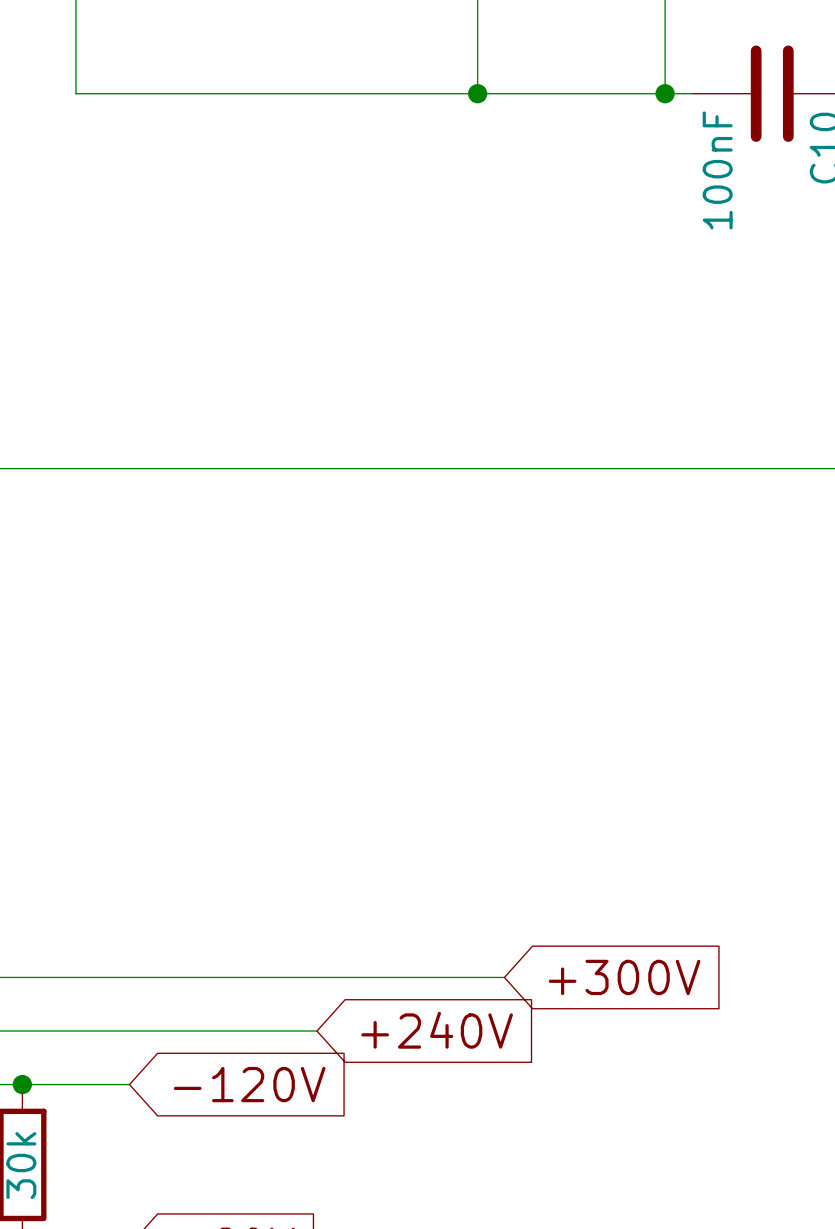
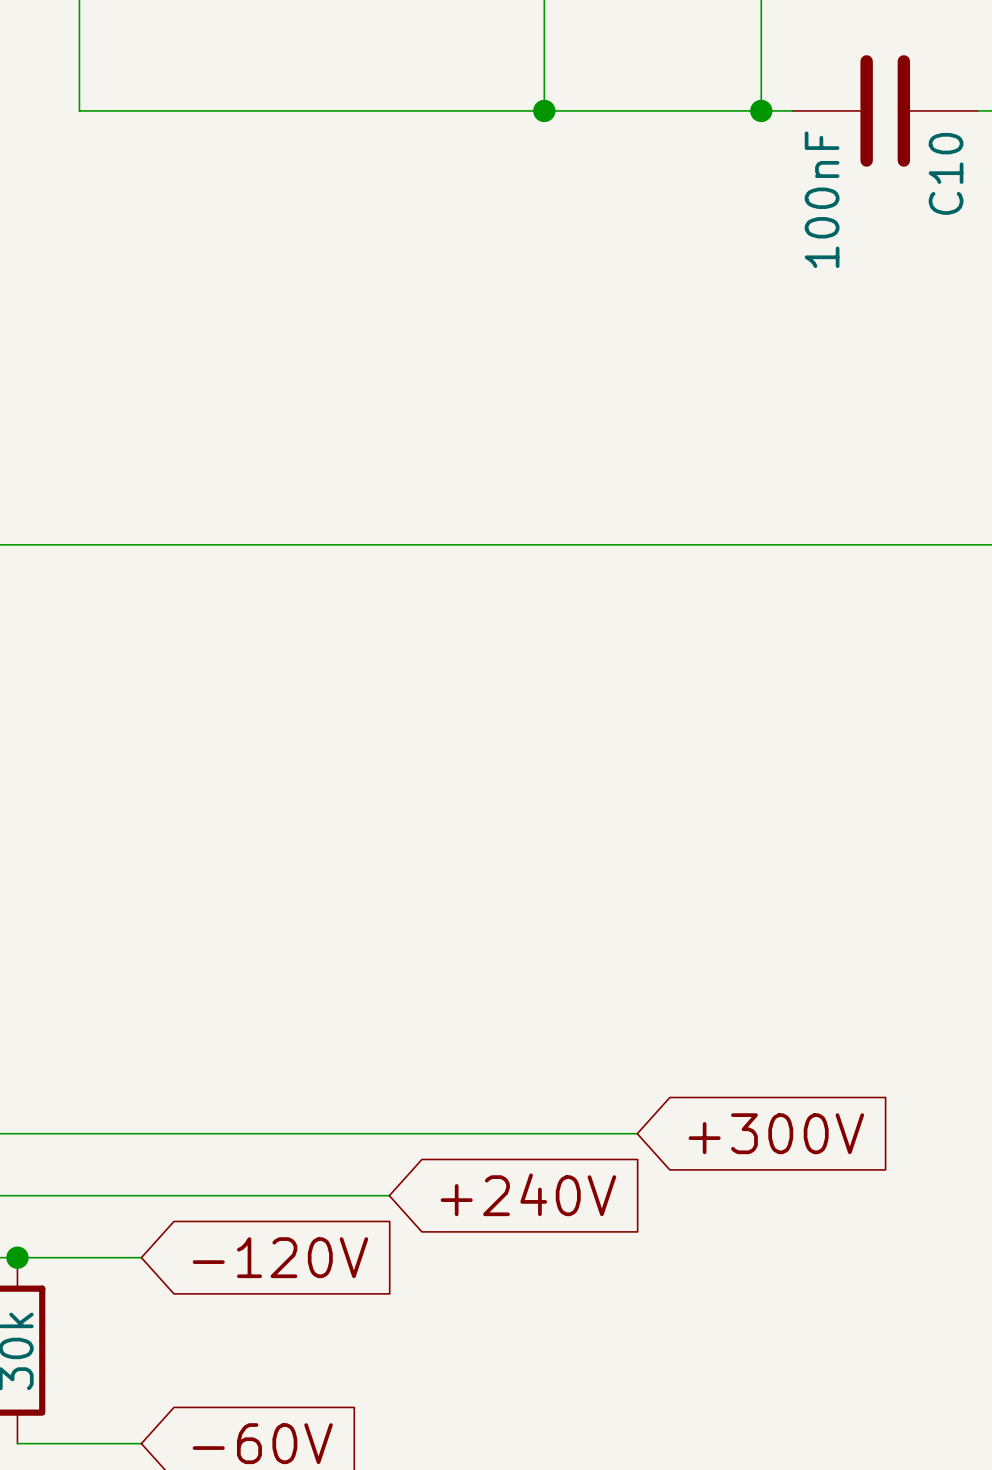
wire: none -> (575, 1133) (637, 1133)
global label position: +300V (624, 977) -> +300V (776, 1133)
global label position: +240V (437, 1030) -> +240V (528, 1194)
wire: none -> (358, 1195) (389, 1195)

